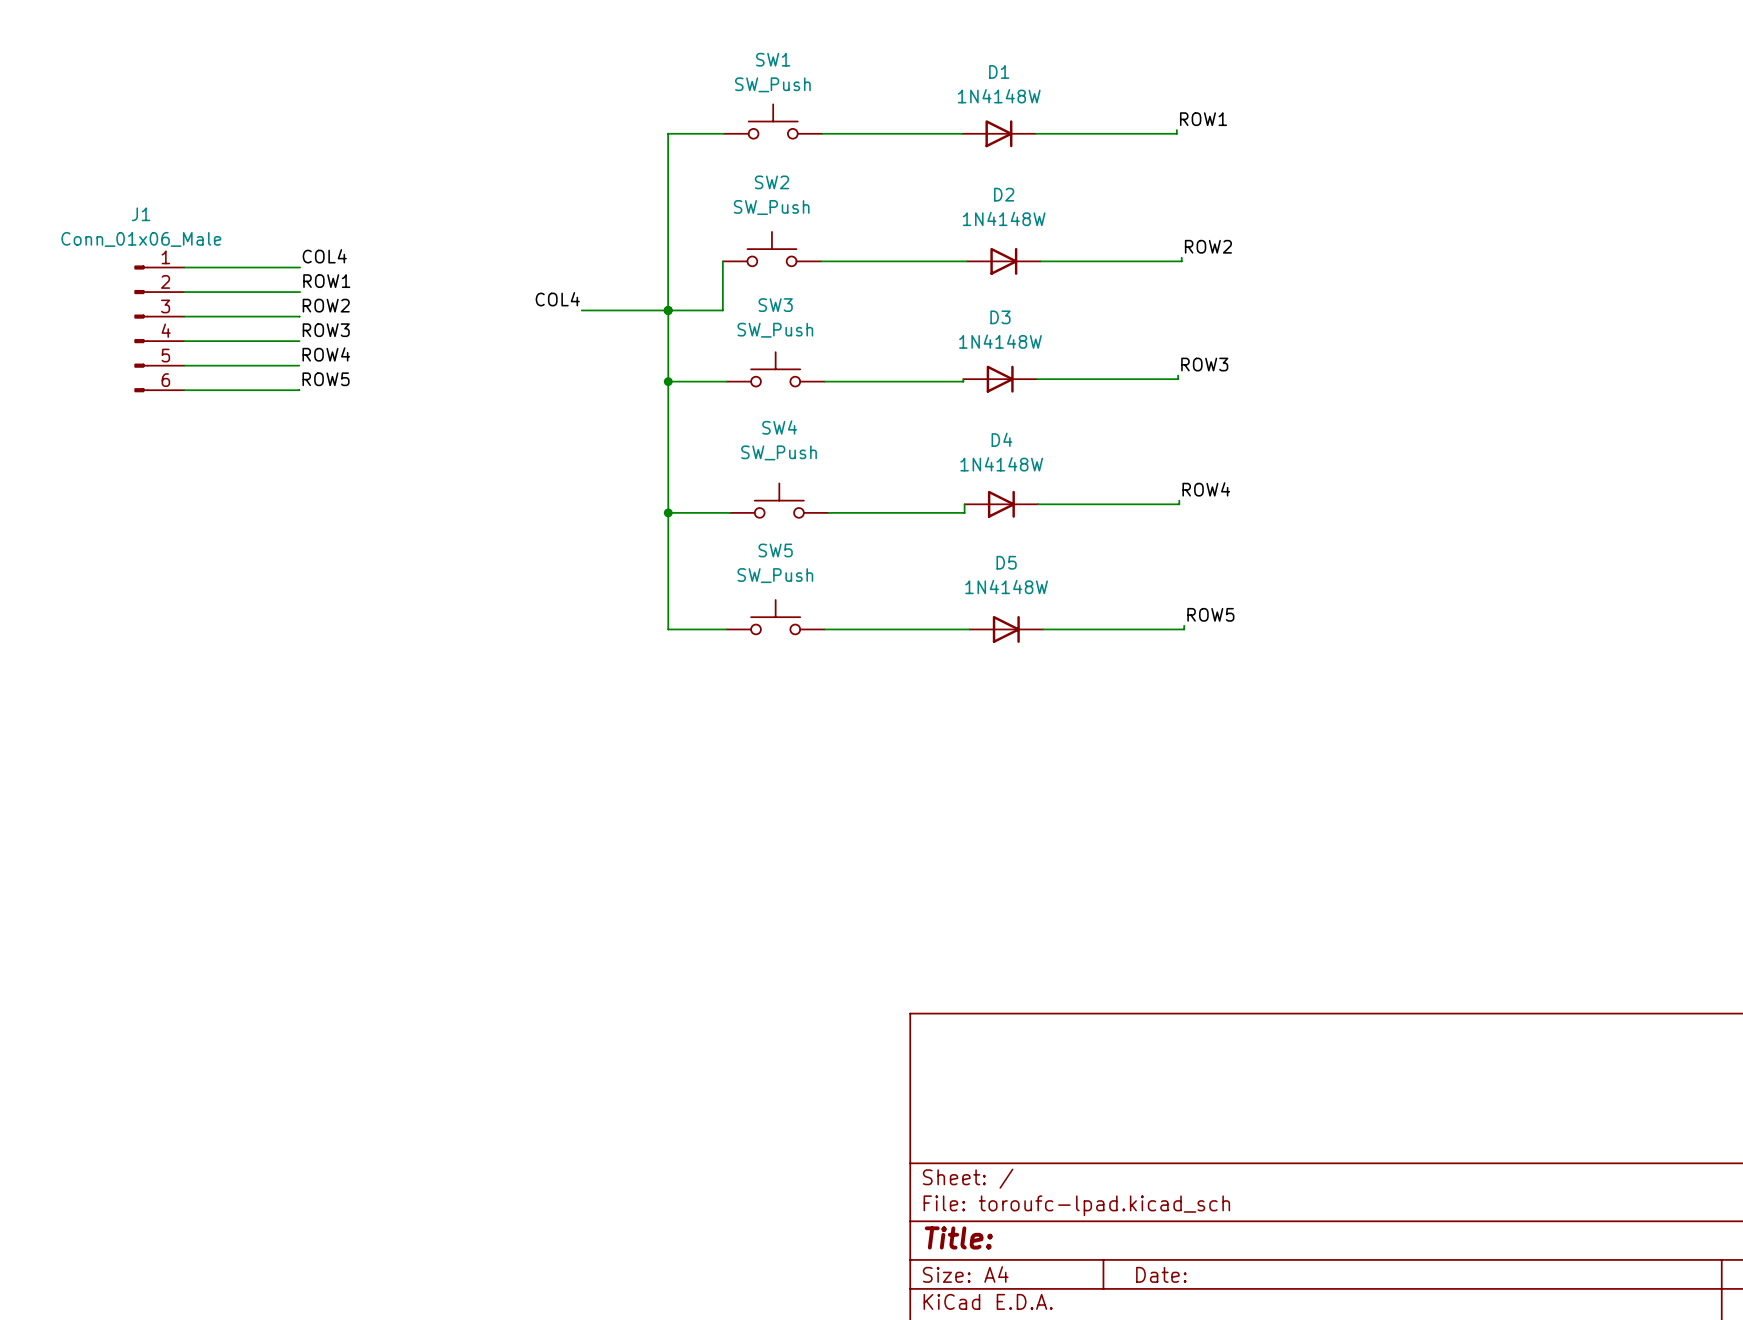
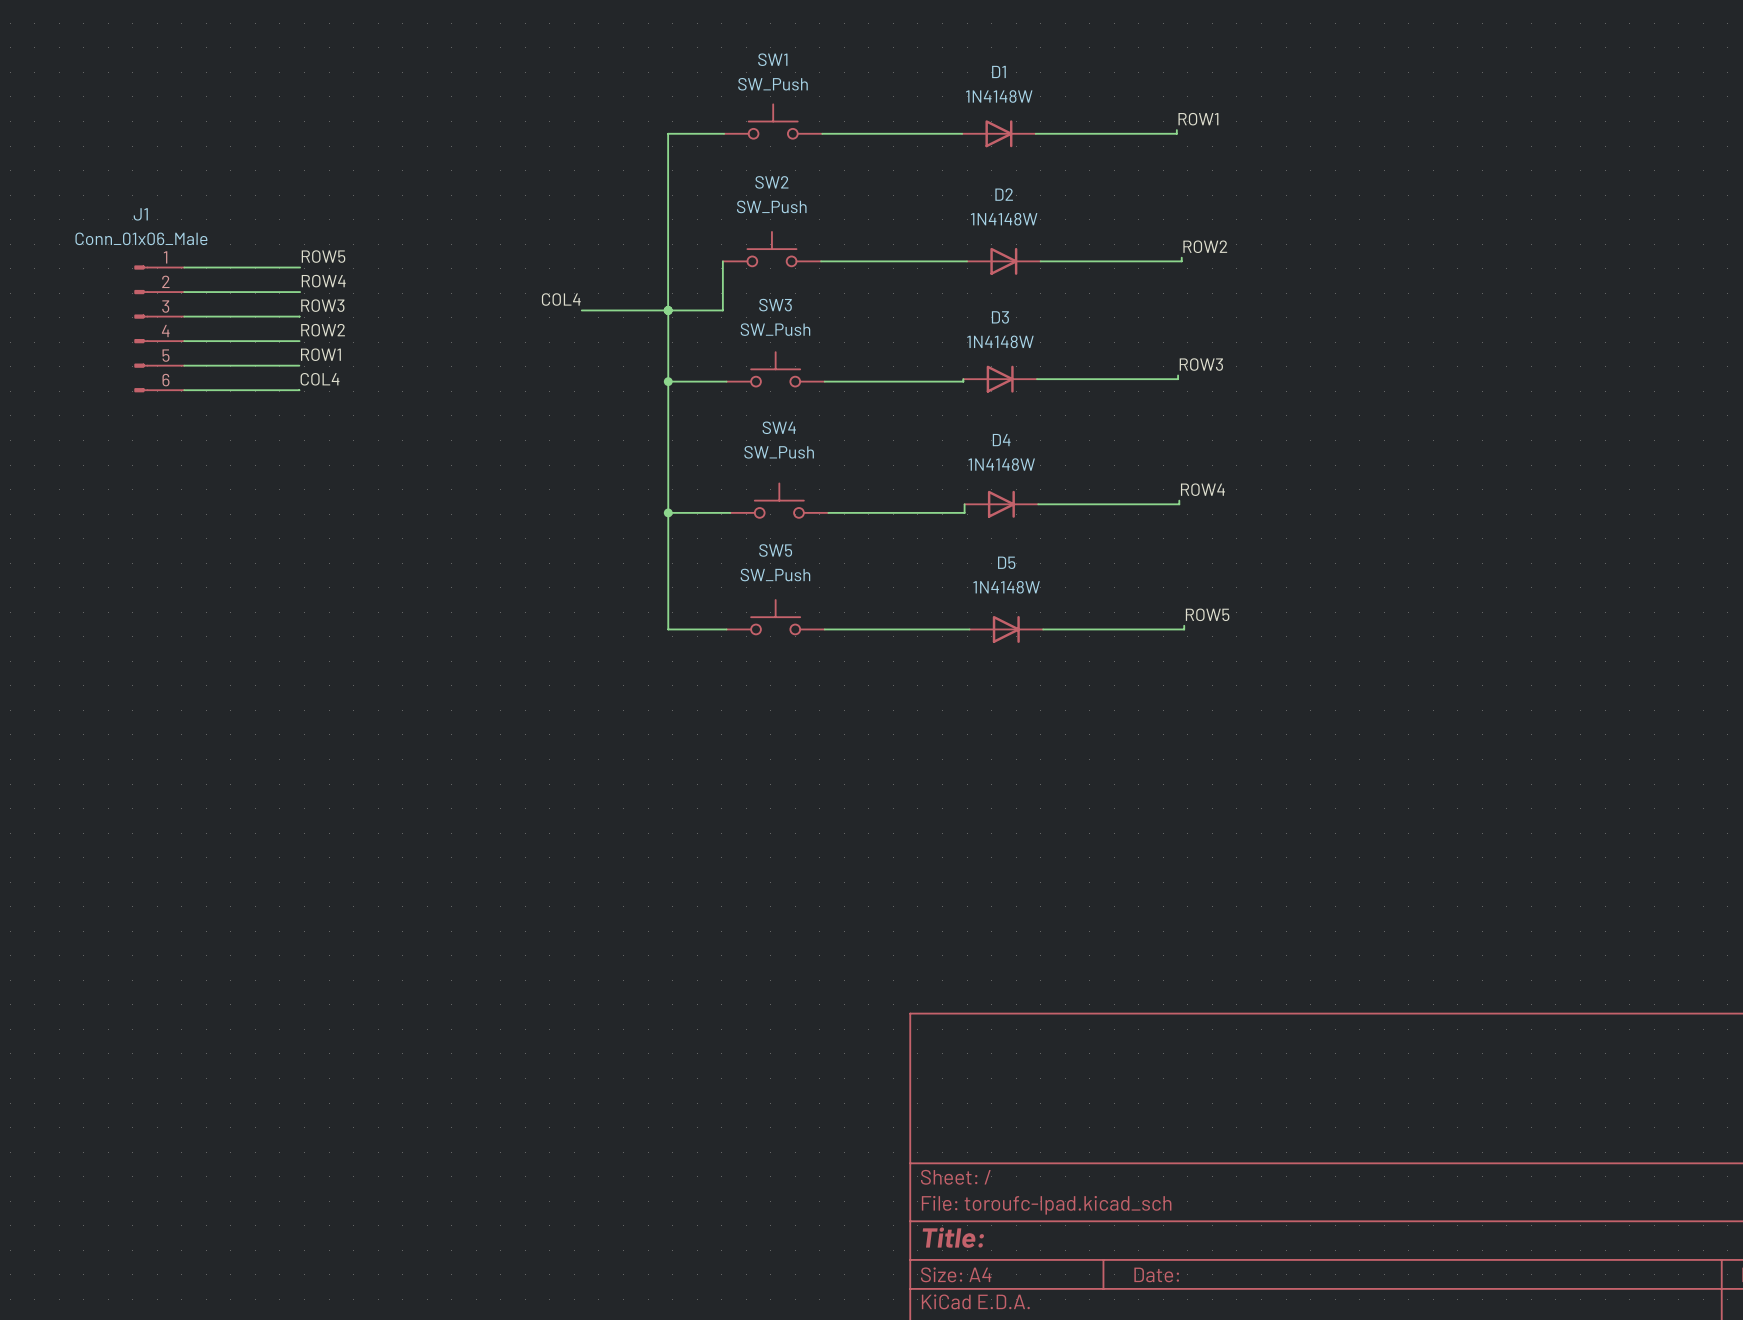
label: COL4 (324, 256) -> ROW5 (323, 256)
label: ROW1 (326, 281) -> ROW4 (323, 281)
label: ROW2 (326, 305) -> ROW3 (322, 305)
label: ROW3 (326, 330) -> ROW2 (323, 330)
label: ROW4 (326, 354) -> ROW1 (320, 354)
label: ROW5 (326, 379) -> COL4 (320, 379)

